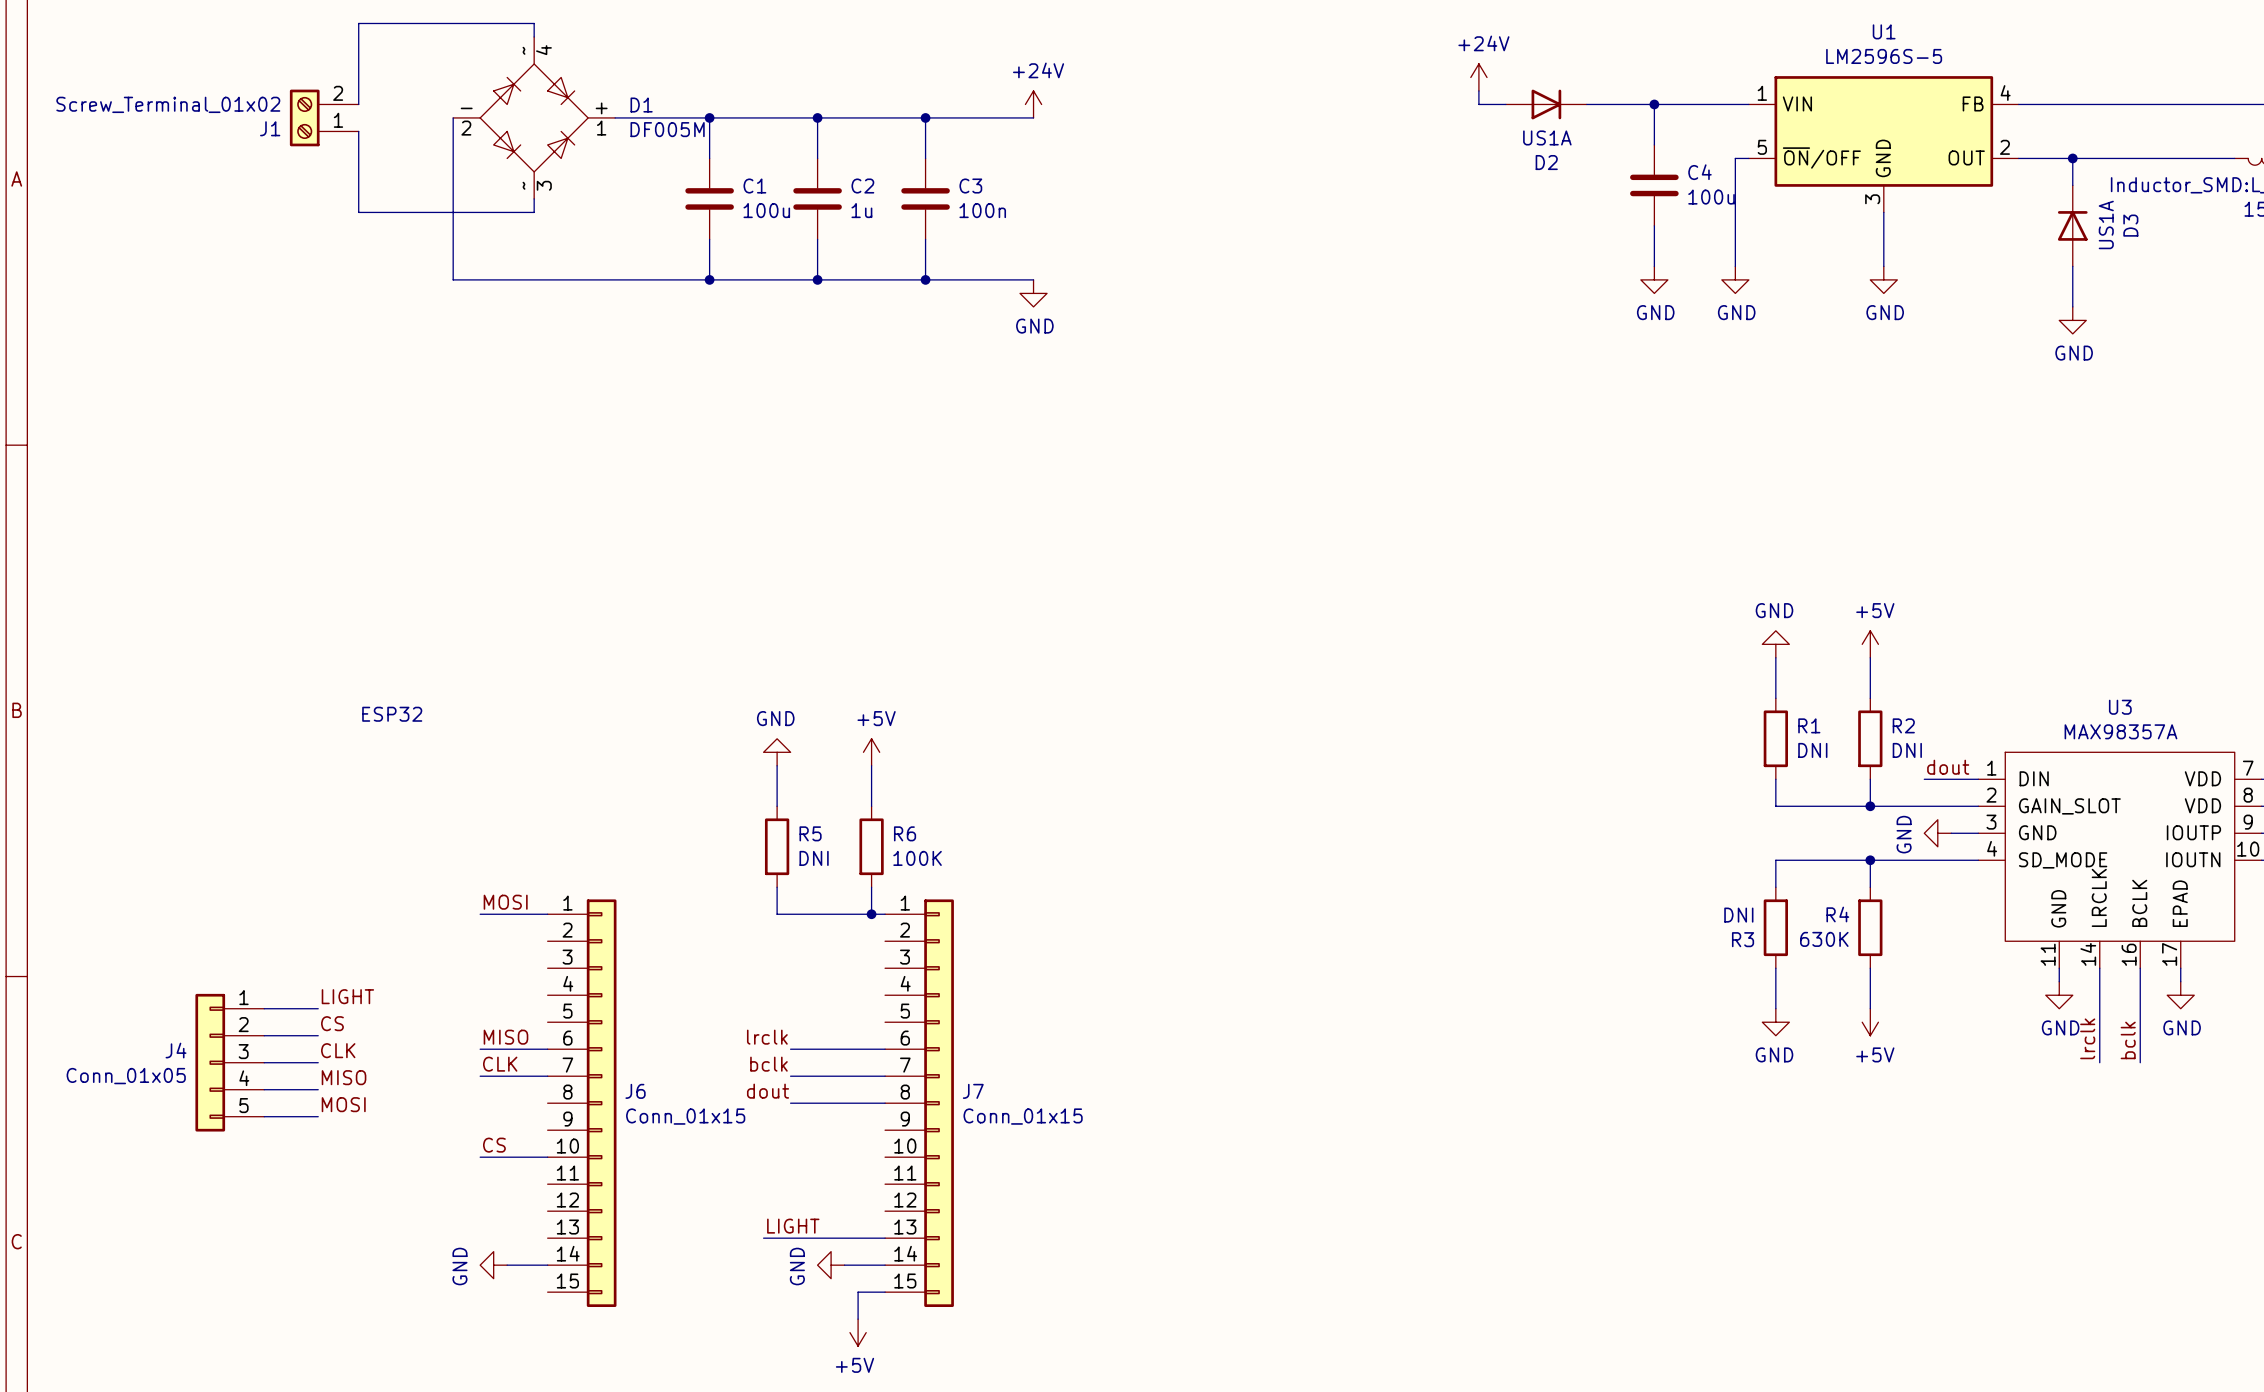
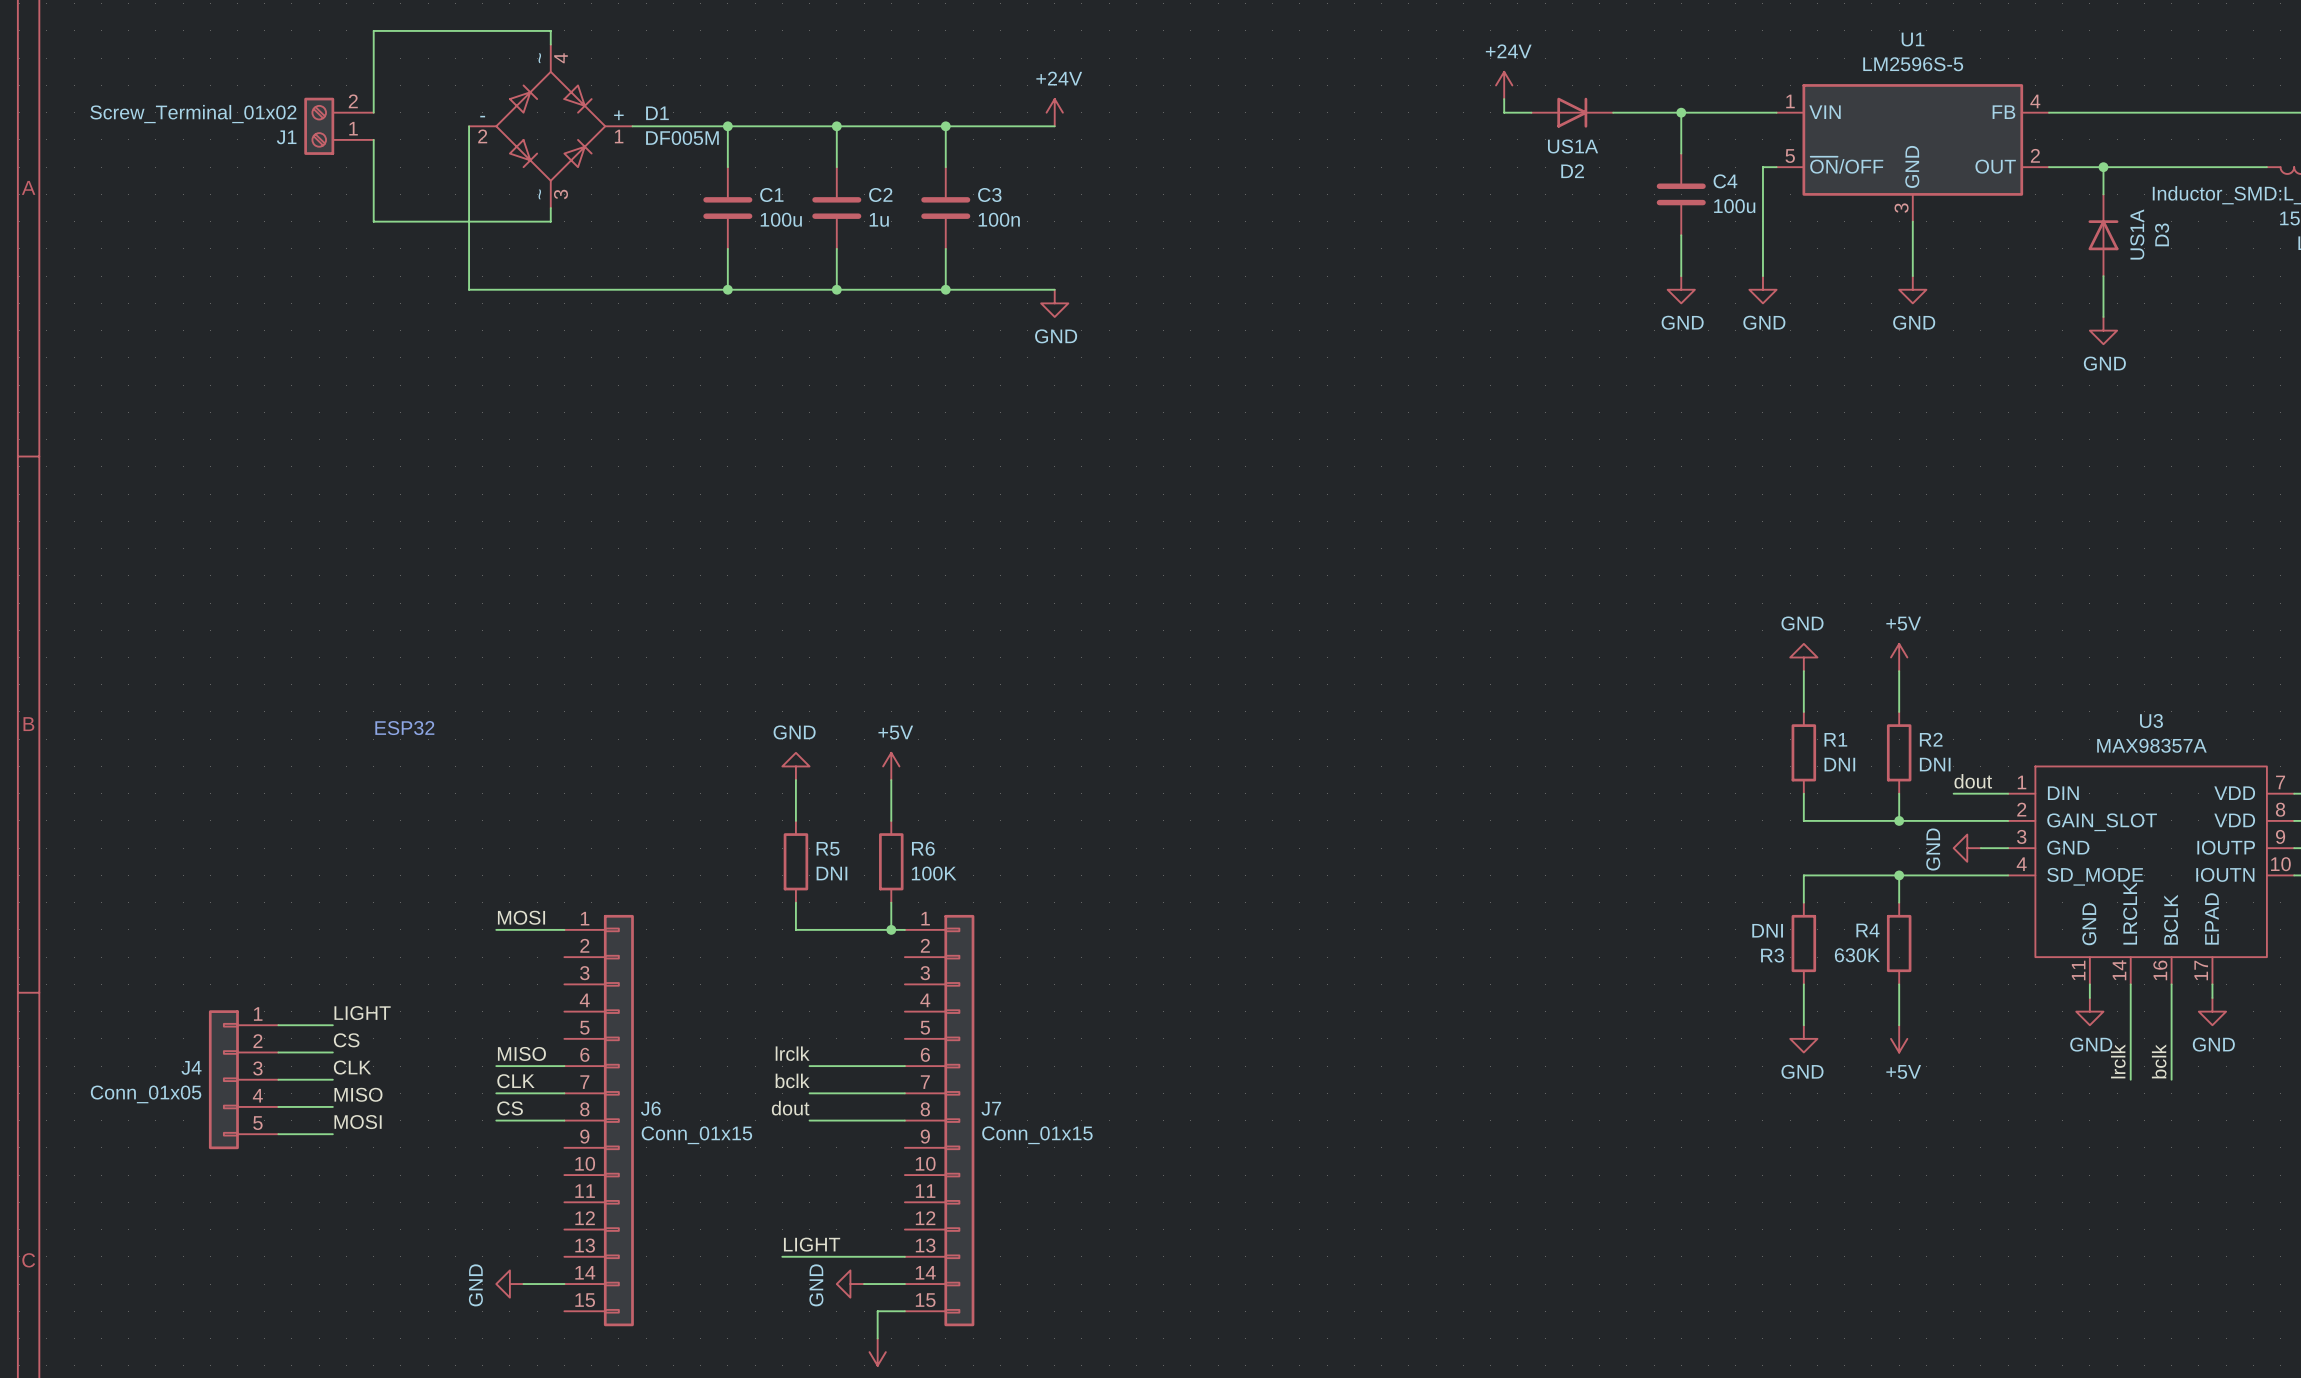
label position: CS (494, 1145) -> CS (510, 1108)
wire: (480, 1157) (547, 1157) -> (496, 1120) (564, 1120)

